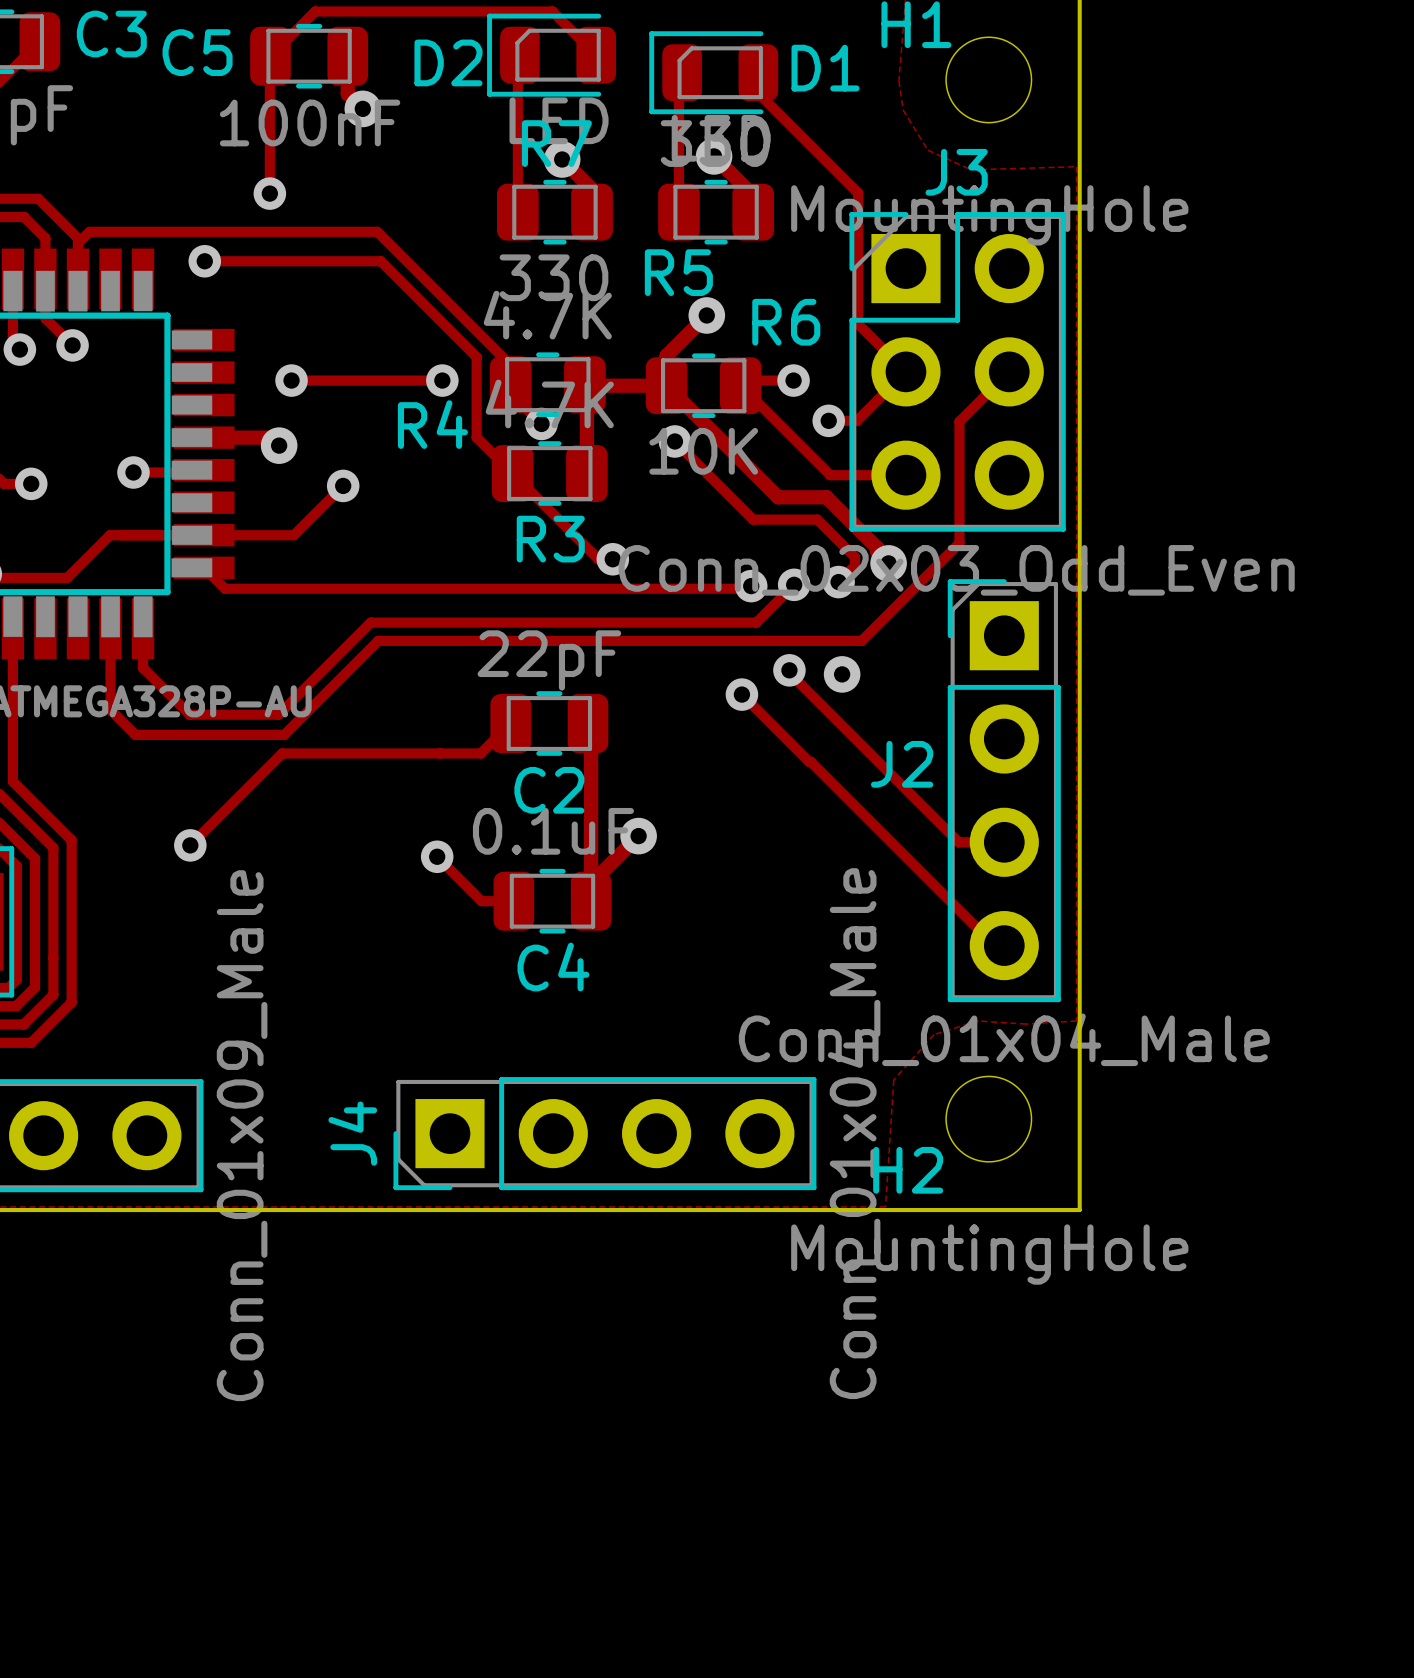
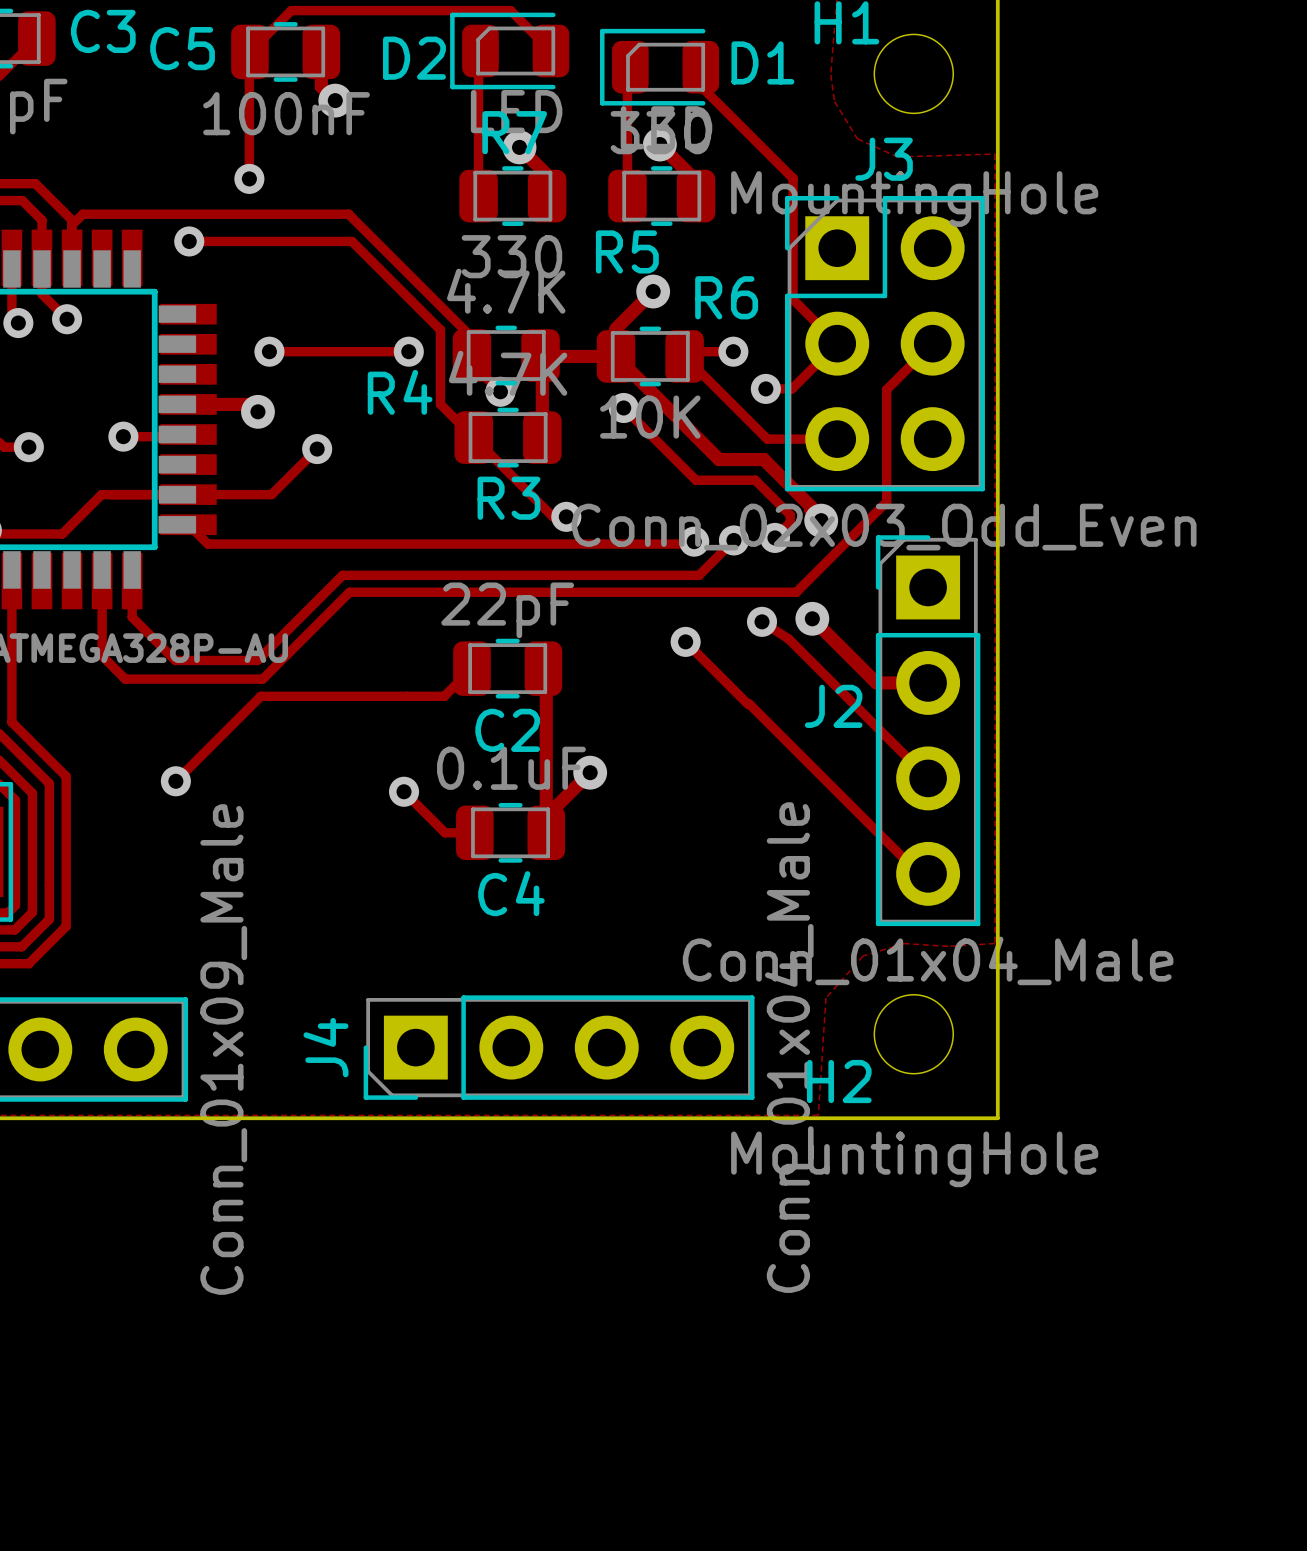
track: none -> (812, 618) (876, 682) (928, 682)
track: (789, 670) (789, 672) (958, 842) (1004, 842) -> (762, 621) (788, 639) (928, 778)
via position: (789, 670) -> (762, 621)
via position: (842, 674) -> (812, 618)

